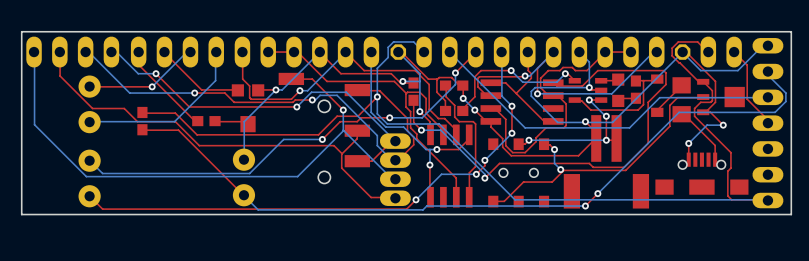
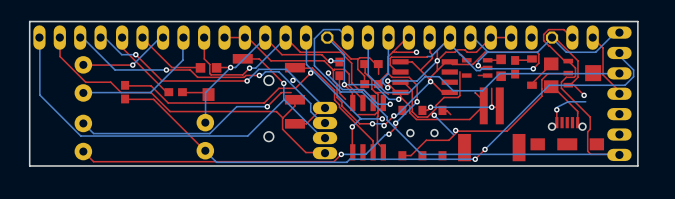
bottom track: (388, 47) (388, 57) (377, 68) (377, 113) (387, 123) (439, 123) (515, 199) (517, 199) -> (319, 33) (314, 38) (314, 65) (340, 91) (362, 91) (421, 154)
bottom track: (371, 52) (371, 112) (385, 127) (403, 127) (426, 149) (436, 149) -> (306, 37) (306, 64) (360, 118) (382, 118)
bottom track: (450, 52) (525, 127) (629, 127) (659, 97) -> (368, 38) (368, 74) (385, 92) (409, 92) (425, 76) (439, 76) (453, 90) (482, 90) (499, 73) (533, 73)
top track: (475, 52) (455, 72) -> none
bottom track: none -> (388, 37) (388, 73) (382, 79) (382, 82) (387, 87)
top track: none -> (408, 37) (392, 52)
bottom track: (501, 52) (501, 96) (511, 106) -> none
bottom track: (580, 52) (589, 62) (589, 82) -> (487, 51) (478, 61)
bottom track: (656, 52) (652, 52) (611, 93) (591, 93) -> (533, 68) (481, 68) (480, 70)
bottom track: (511, 70) (522, 82) (556, 82) (565, 73) -> none
bottom track: (664, 70) (612, 122) (557, 122) (531, 96) (531, 91) (535, 87) (589, 87) -> (537, 52) (488, 52) (474, 38) (470, 38)
bottom track: (455, 72) (455, 84) (422, 117) -> (390, 104) (377, 104) (363, 89) (346, 89)
via: (455, 72) -> none
via: (565, 73) -> none
via: (525, 76) -> none
top track: (540, 78) (540, 87) (548, 95) (558, 96) (566, 103) -> (459, 71) (459, 78)
top track: (643, 80) (643, 104) (638, 110) (590, 110) (581, 100) (574, 100) -> none
bottom track: none -> (437, 60) (417, 80) (387, 80)
via: none -> (437, 60)
top track: none -> (449, 61) (445, 62) (430, 77) (430, 81)
top track: (658, 91) (648, 102) (648, 143) (624, 167) (593, 167) (589, 163) (499, 163) (484, 178) -> none
via: none -> (533, 68)
via: (537, 93) -> none
bottom track: (587, 93) (537, 93) -> (476, 70) (447, 41) (450, 37)
via: none -> (328, 73)
bottom track: (463, 98) (474, 110) -> none
via: (463, 98) -> none
bottom track: (589, 100) (606, 116) -> none
via: (589, 100) -> none
via: none -> (293, 80)
via: none -> (387, 80)
top track: (511, 106) (511, 112) -> (387, 73) (392, 77) (409, 77) (417, 85)
via: (511, 106) -> none
bottom track: none -> (430, 81) (396, 115) (393, 115)
via: none -> (430, 81)
via: (474, 110) -> none
bottom track: none -> (344, 84) (374, 84) (389, 99) (398, 99)
via: none -> (387, 87)
via: (606, 116) -> none
top track: (389, 117) (361, 117) (357, 121) (352, 121) -> none
via: (389, 117) -> none
bottom track: (417, 117) (389, 117) -> (342, 89) (328, 75) (328, 73)
via: (585, 121) -> none
top track: (475, 123) (475, 166) (469, 172) (469, 197) -> (376, 92) (377, 94) (377, 142) (382, 148) (383, 152)
bottom track: (723, 125) (707, 125) (688, 143) -> none
bottom track: (421, 130) (440, 130) (484, 174) (484, 178) -> none
via: (421, 130) -> none
via: none -> (398, 99)
bottom track: none -> (585, 101) (568, 101) (556, 107)
via: none -> (390, 104)
top track: (413, 140) (413, 144) (398, 159) (395, 160) -> (339, 107) (373, 140)
bottom track: (429, 149) (429, 165) -> none
via: (436, 149) -> none
bottom track: (554, 149) (554, 163) (560, 169) -> none
via position: (554, 149) -> (434, 115)
bottom track: none -> (434, 115) (453, 134)
top track: none -> (393, 115) (384, 125)
via: none -> (393, 115)
bottom track: none -> (360, 118) (352, 127)
via: none -> (382, 118)
top track: (439, 161) (456, 178) (456, 182) -> (359, 123) (372, 123)
bottom track: none -> (372, 123) (382, 123) (384, 125)
via: none -> (372, 123)
via: none -> (384, 125)
bottom track: (476, 174) (441, 174) (416, 199) -> (388, 134) (385, 134) (365, 154) (341, 154)
via: (484, 178) -> none

